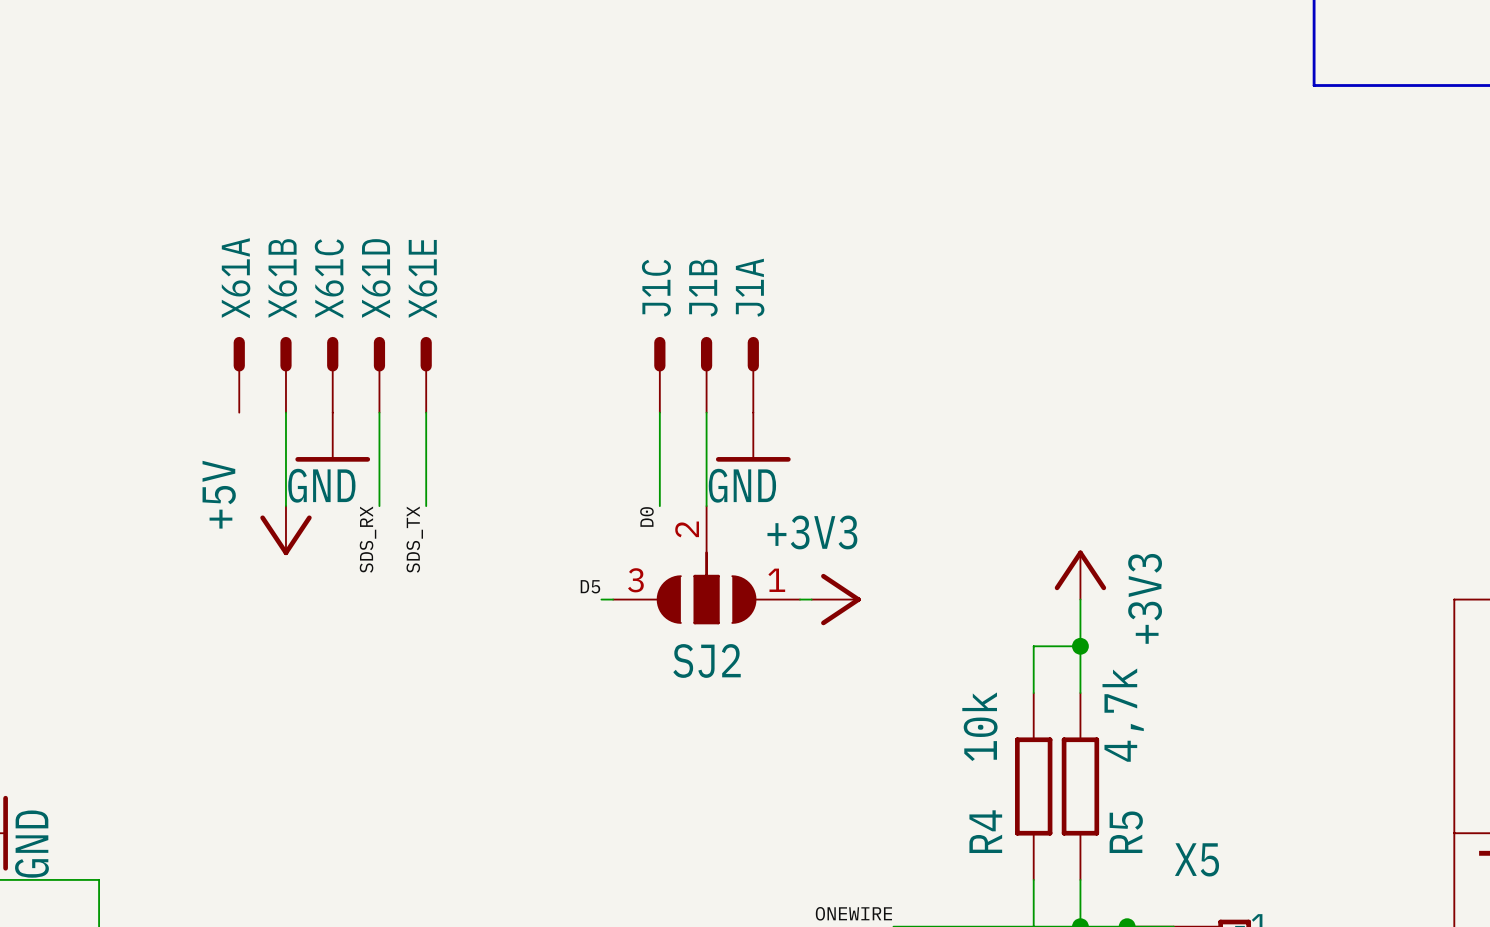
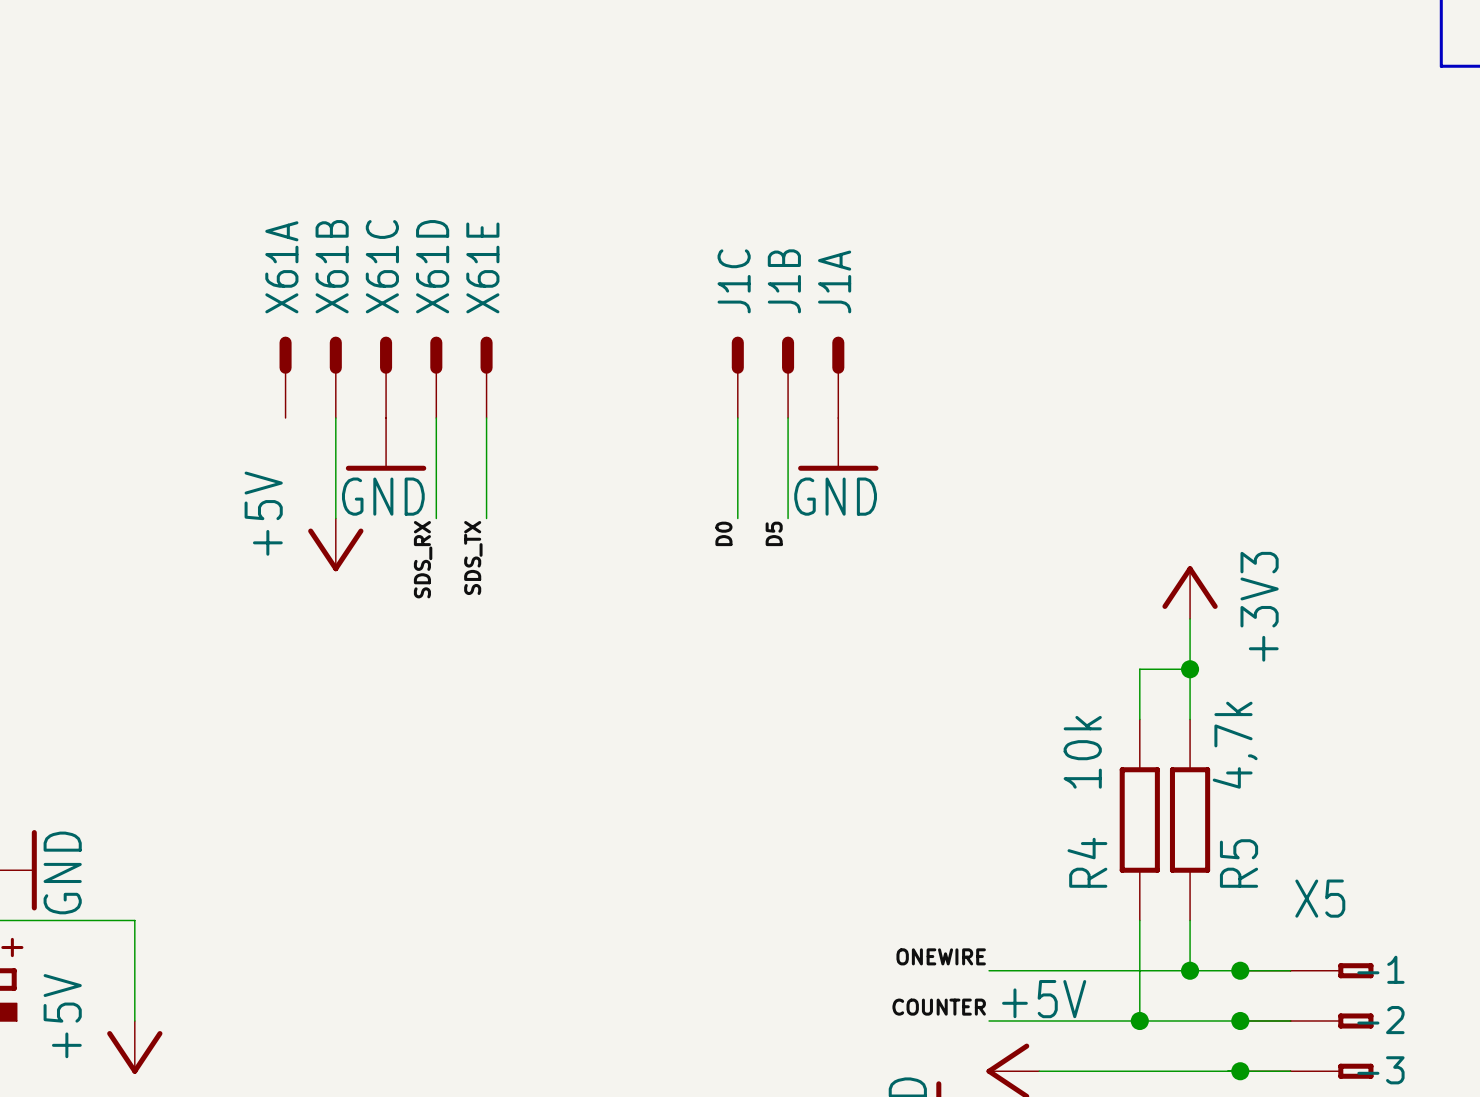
SJ2: (706, 565) -> none
label rotation: 0° (590, 586) -> 90° counterclockwise (774, 533)
label position: D5 (590, 586) -> D5 (774, 533)
wire: (601, 599) (613, 599) -> none
wire: (800, 599) (811, 599) -> none
power symbol: +3V3 (836, 599) -> none

